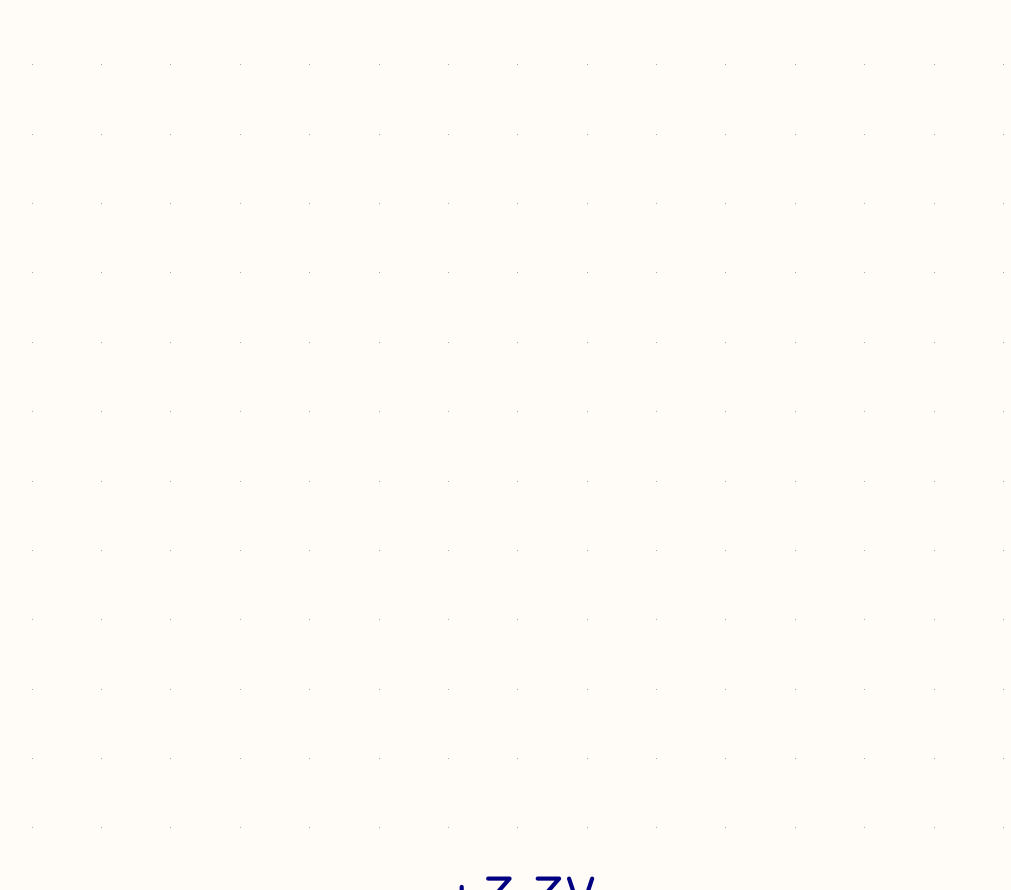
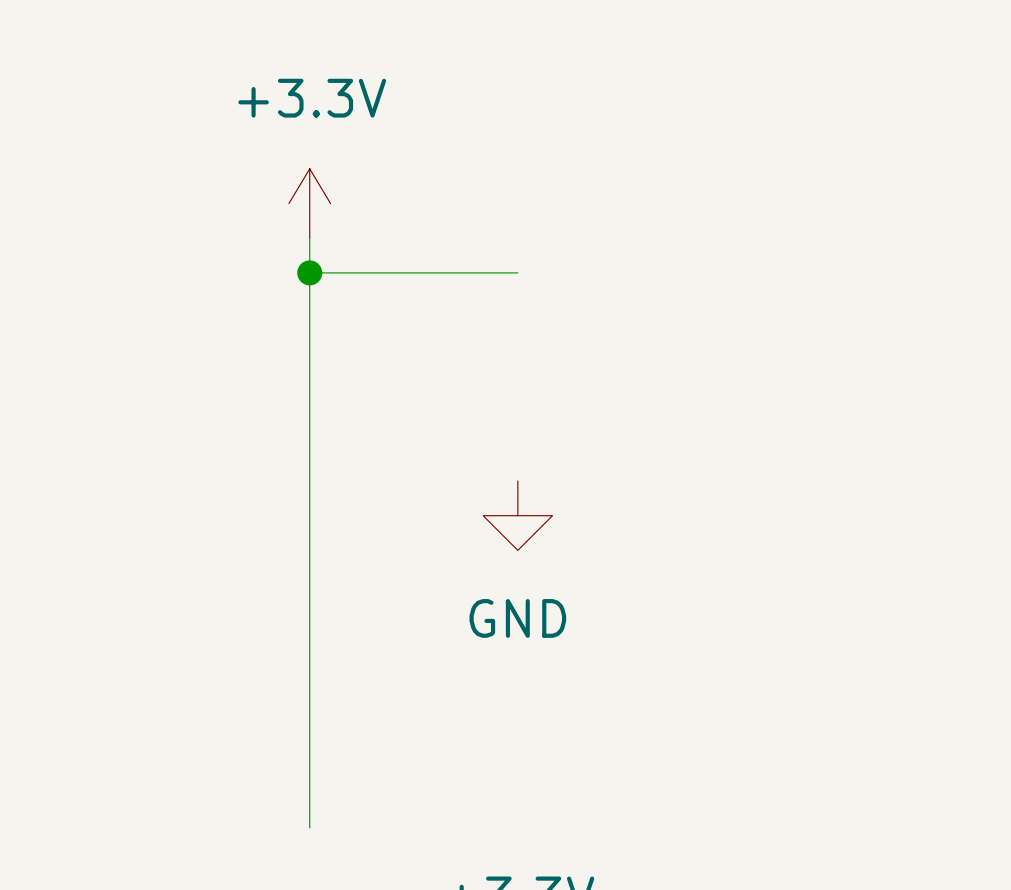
power symbol: none -> +3.3V (309, 203)
wire: none -> (309, 238) (309, 827)
wire: none -> (309, 272) (517, 272)
junction: none -> (309, 272)
power symbol: none -> GND (517, 515)

